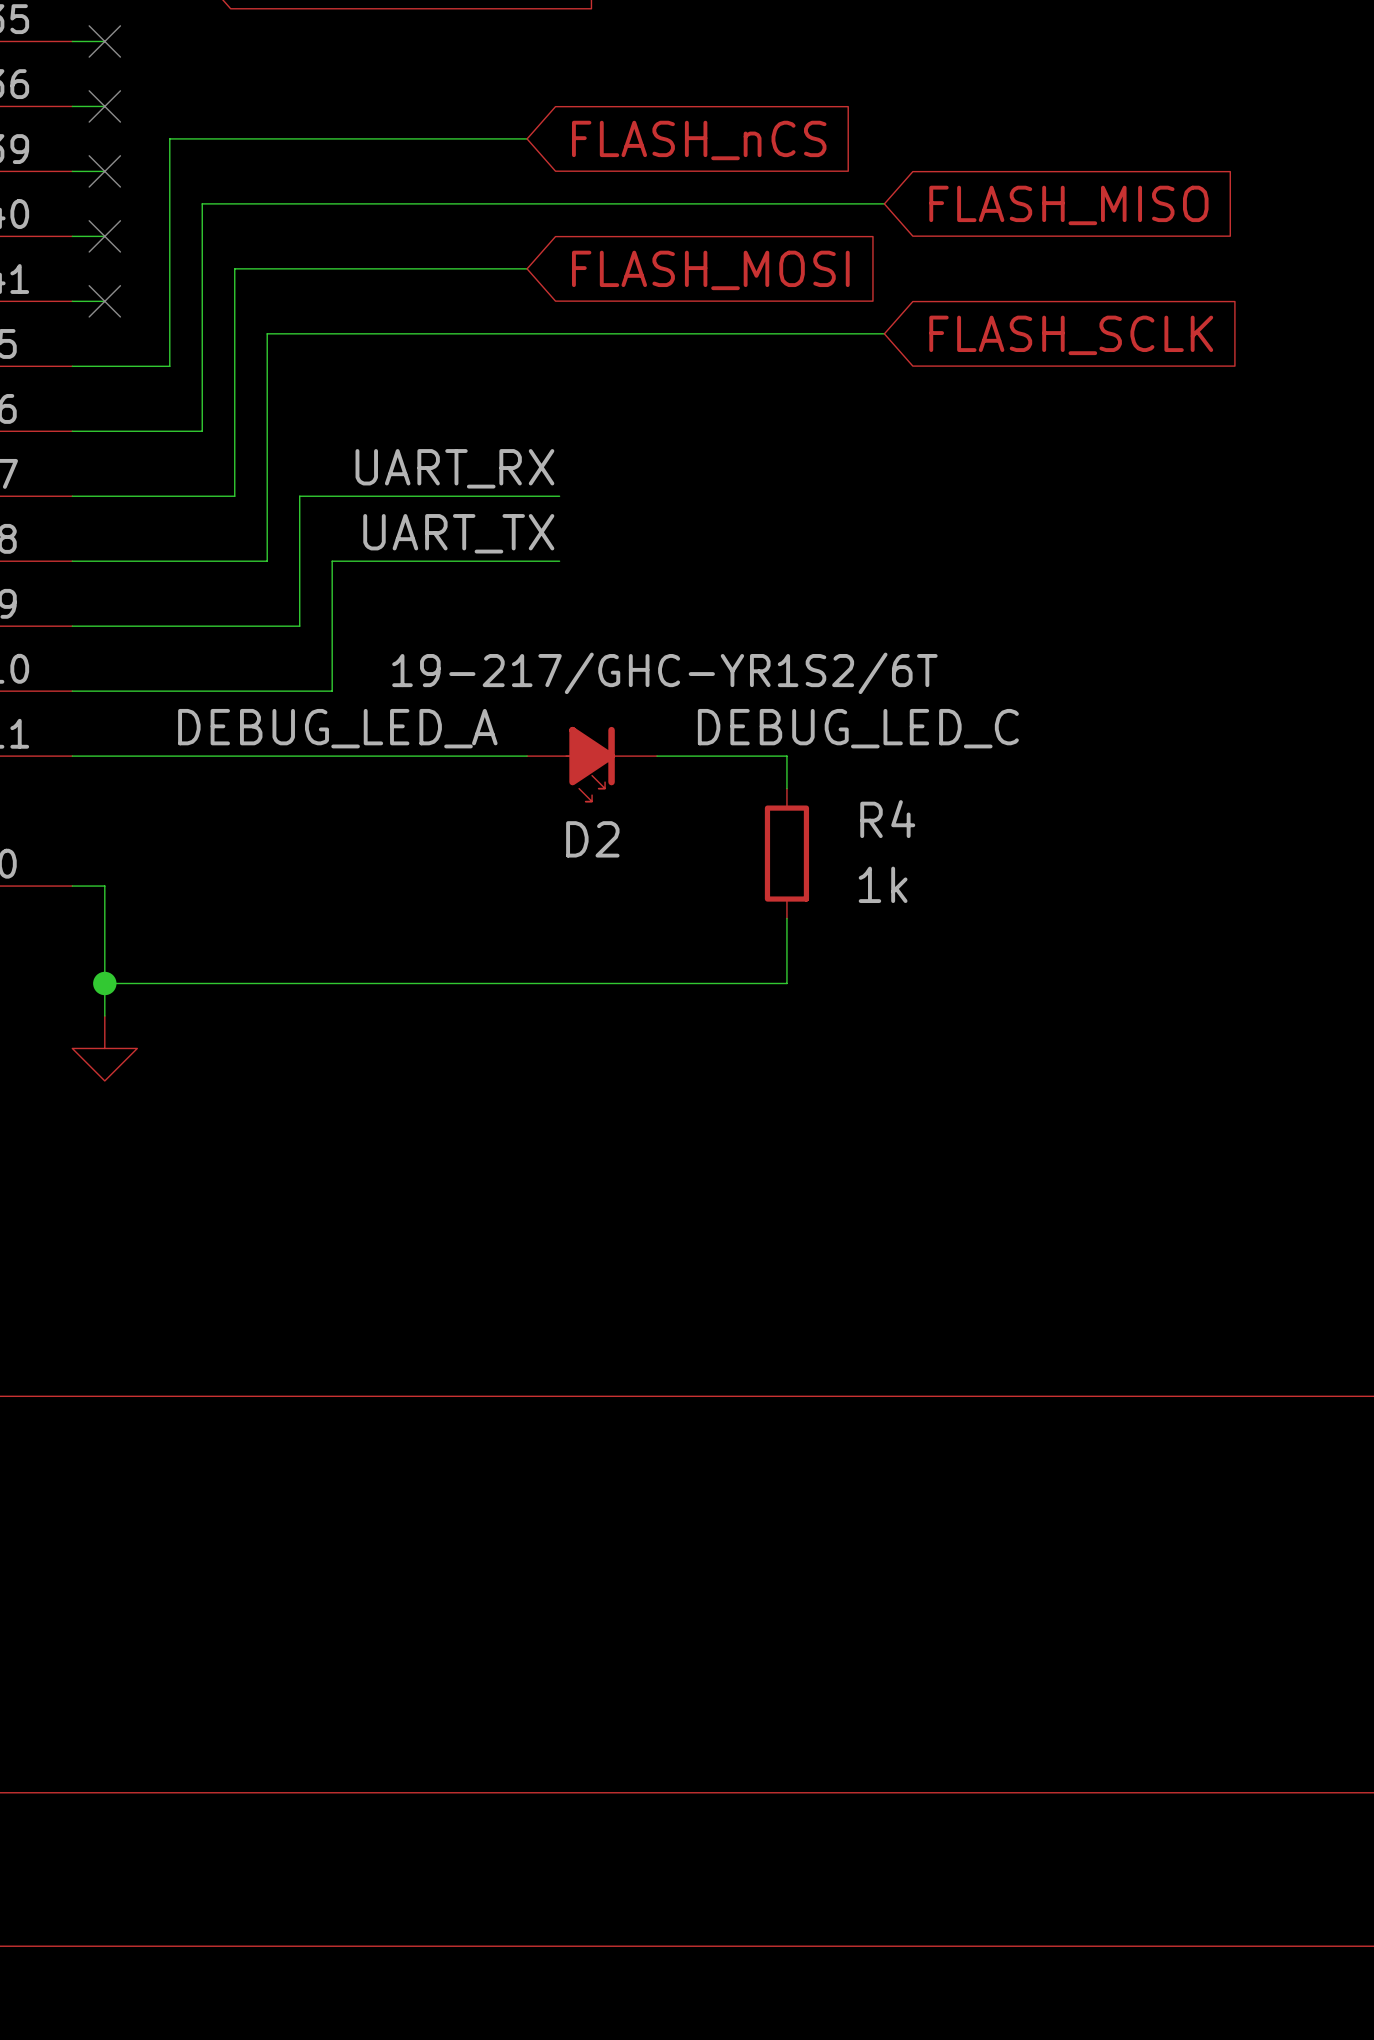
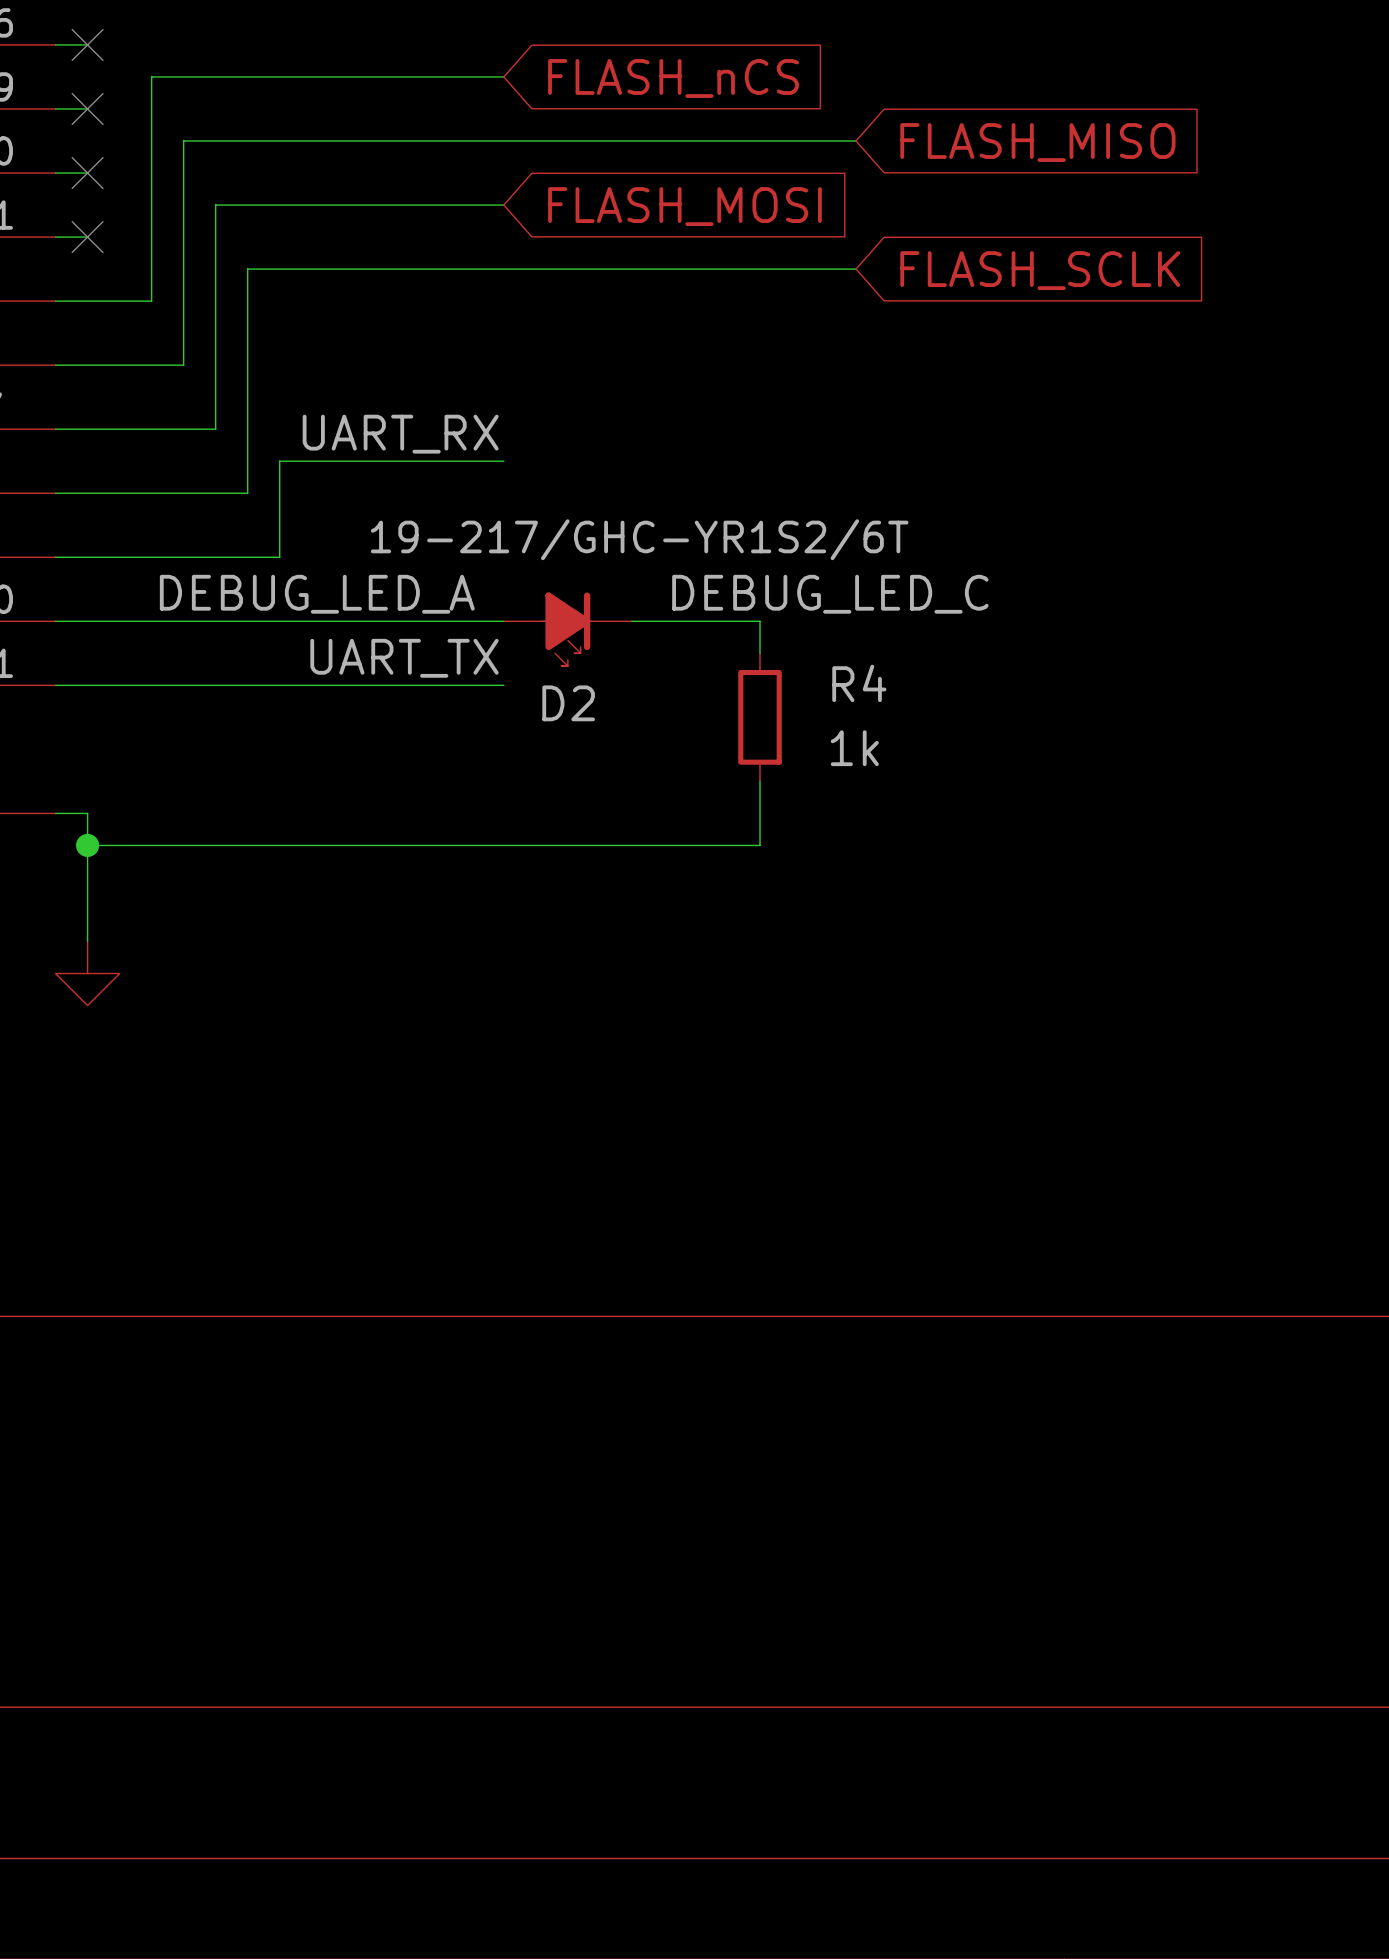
label position: UART_RX (454, 468) -> UART_RX (400, 434)
wire: (559, 496) (299, 496) (299, 528) -> (503, 461) (279, 461)
label position: UART_TX (458, 533) -> UART_TX (404, 658)
wire: (559, 561) (332, 561) (332, 691) -> (503, 621) (311, 621)
label position: DEBUG_LED_A (337, 728) -> DEBUG_LED_A (317, 594)
label position: DEBUG_LED_C (858, 728) -> DEBUG_LED_C (830, 594)
wire: (657, 756) (786, 756) (786, 788) -> (631, 621) (760, 621) (760, 653)
D2 position: (592, 764) -> (567, 629)
R4 position: (786, 853) -> (760, 717)
wire: (786, 918) (786, 983) (104, 983) -> (760, 781) (760, 845) (87, 845)
junction position: (104, 983) -> (87, 845)

